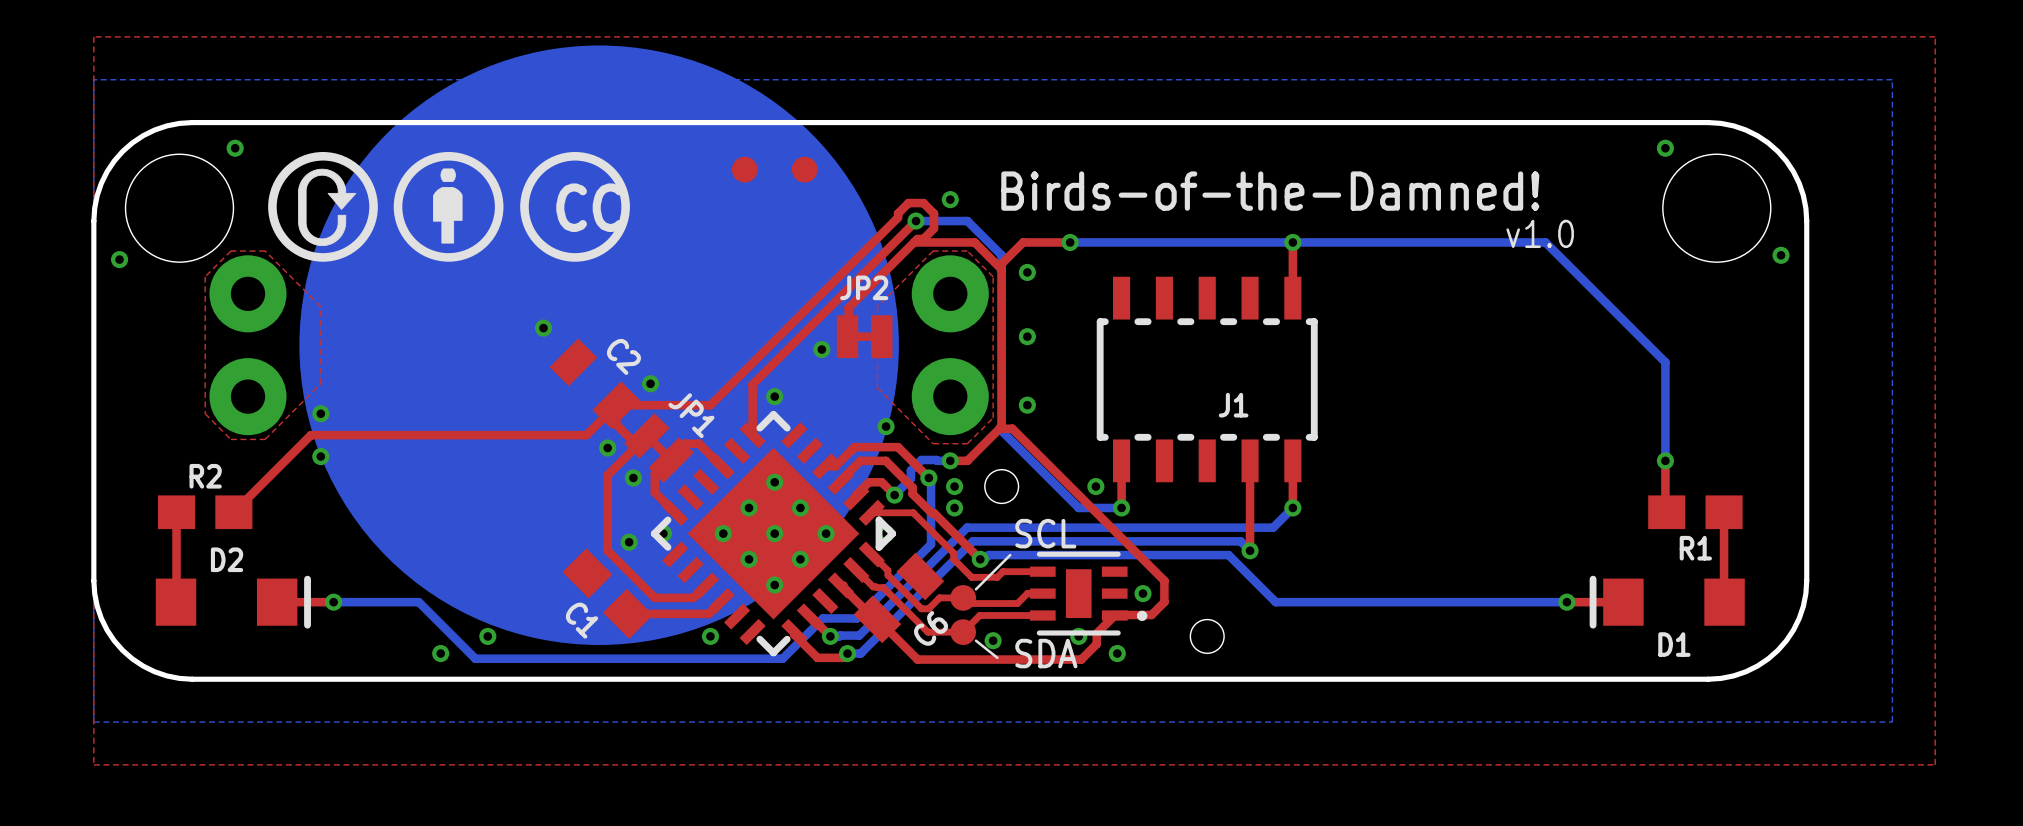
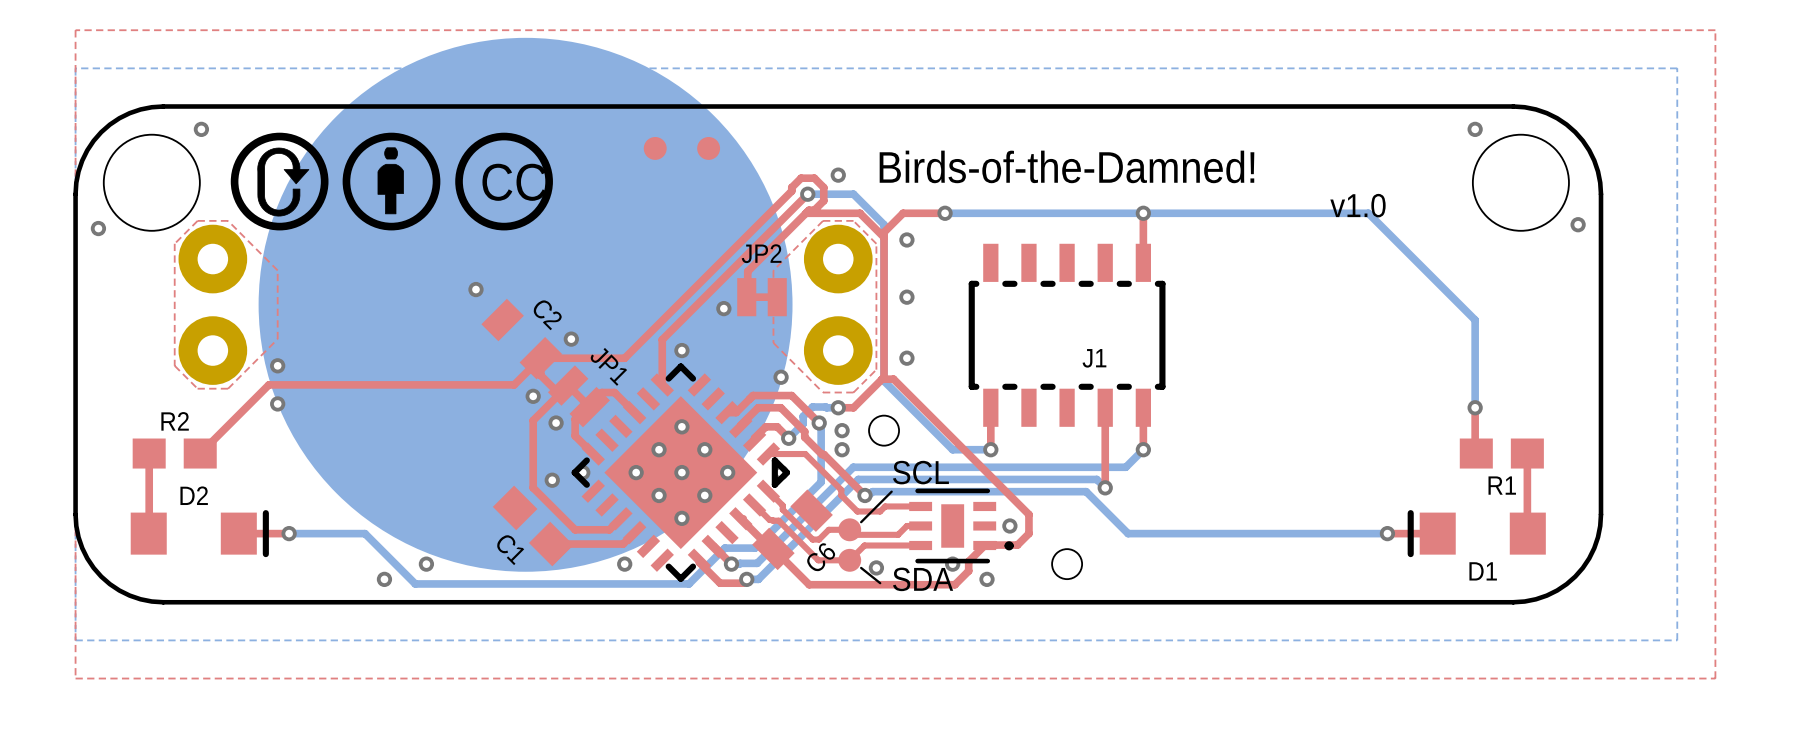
via: (1095, 486) -> none

